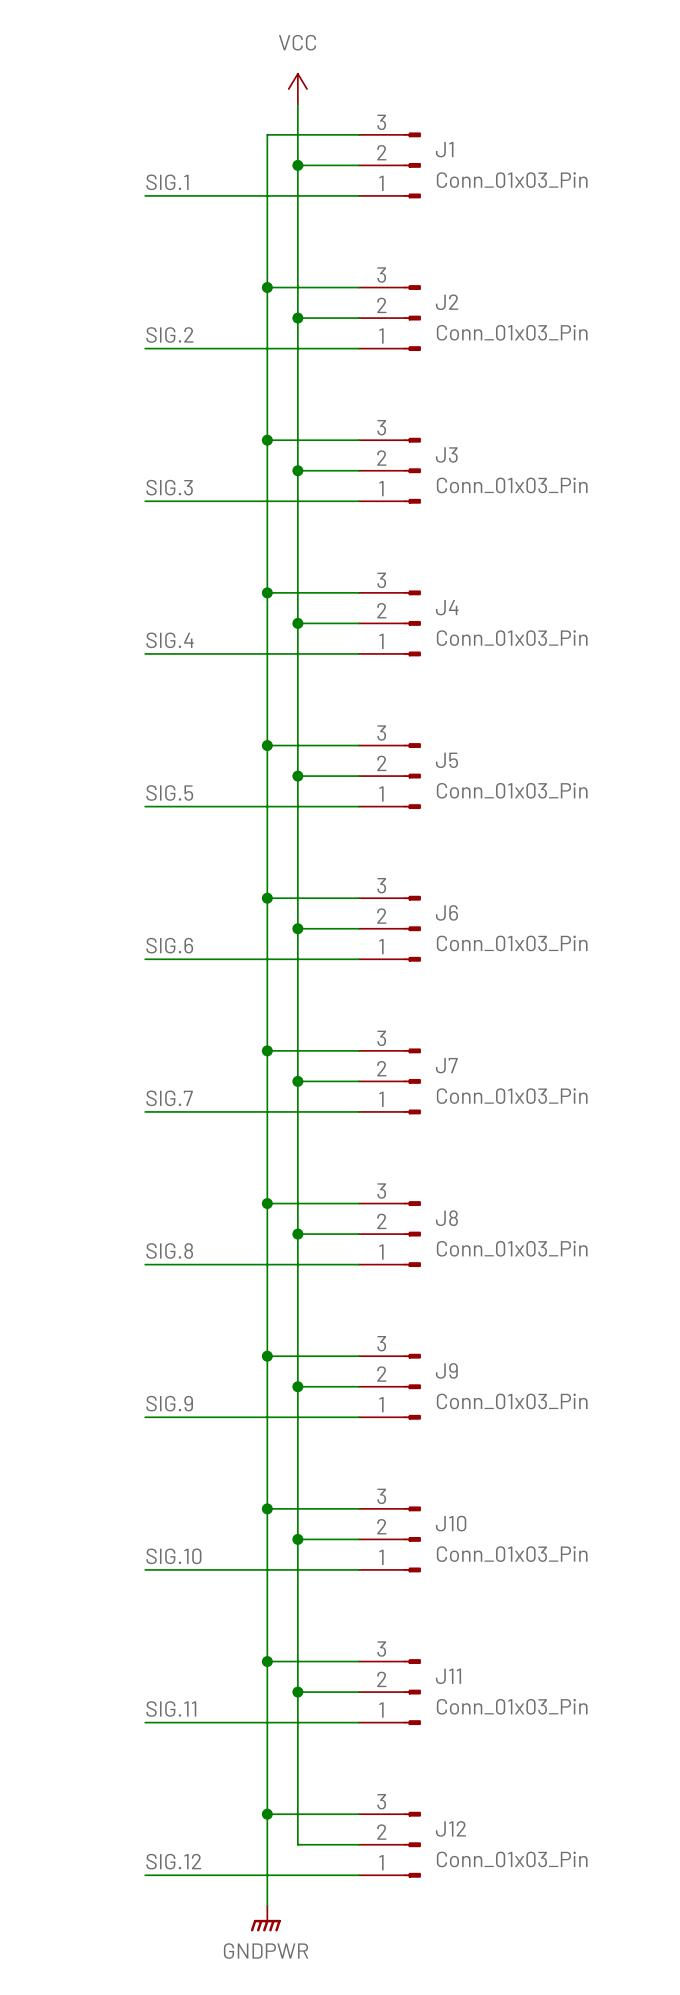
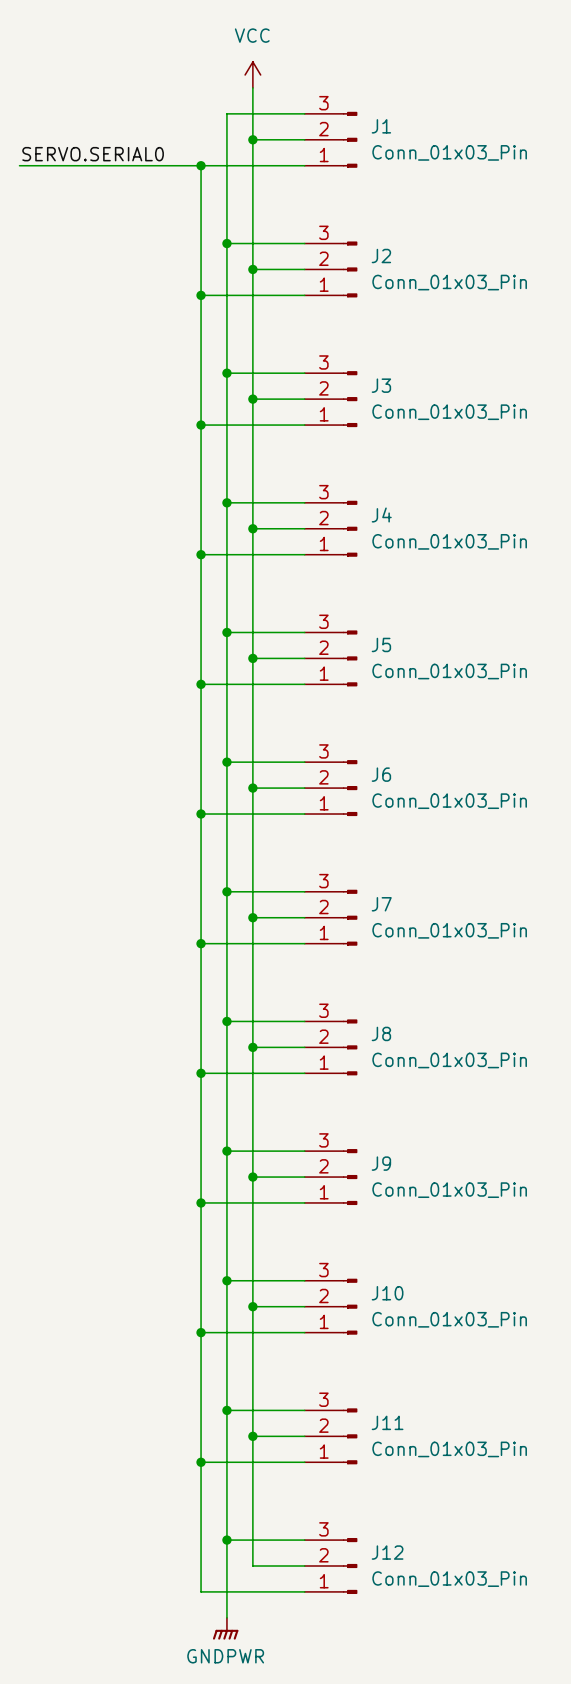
label: none -> SERVO.SERIAL0 (93, 154)
label: SIG.1 (167, 182) -> none
wire: none -> (19, 165) (123, 165)
junction: none -> (201, 165)
label: SIG.2 (169, 334) -> none
wire: (145, 348) (236, 348) -> none
junction: none -> (201, 295)
label: SIG.3 (169, 487) -> none
wire: (145, 501) (236, 501) -> none
junction: none -> (201, 425)
label: SIG.4 (170, 640) -> none
wire: (145, 653) (236, 653) -> none
junction: none -> (201, 554)
label: SIG.5 (169, 792) -> none
wire: (145, 806) (236, 806) -> none
junction: none -> (201, 684)
label: SIG.6 (169, 945) -> none
wire: (145, 959) (236, 959) -> none
junction: none -> (201, 814)
label: SIG.7 (169, 1098) -> none
wire: (145, 1111) (236, 1111) -> none
junction: none -> (201, 943)
label: SIG.8 (169, 1250) -> none
wire: (145, 1264) (236, 1264) -> none
junction: none -> (201, 1073)
label: SIG.9 (169, 1403) -> none
wire: (145, 1417) (236, 1417) -> none
junction: none -> (201, 1202)
label: SIG.10 (173, 1556) -> none
wire: (145, 1569) (236, 1569) -> none
junction: none -> (201, 1332)
label: SIG.11 (171, 1708) -> none
wire: (145, 1722) (236, 1722) -> none
junction: none -> (201, 1462)
label: SIG.12 (173, 1861) -> none
wire: (145, 1875) (236, 1875) -> (201, 165) (201, 1591)

